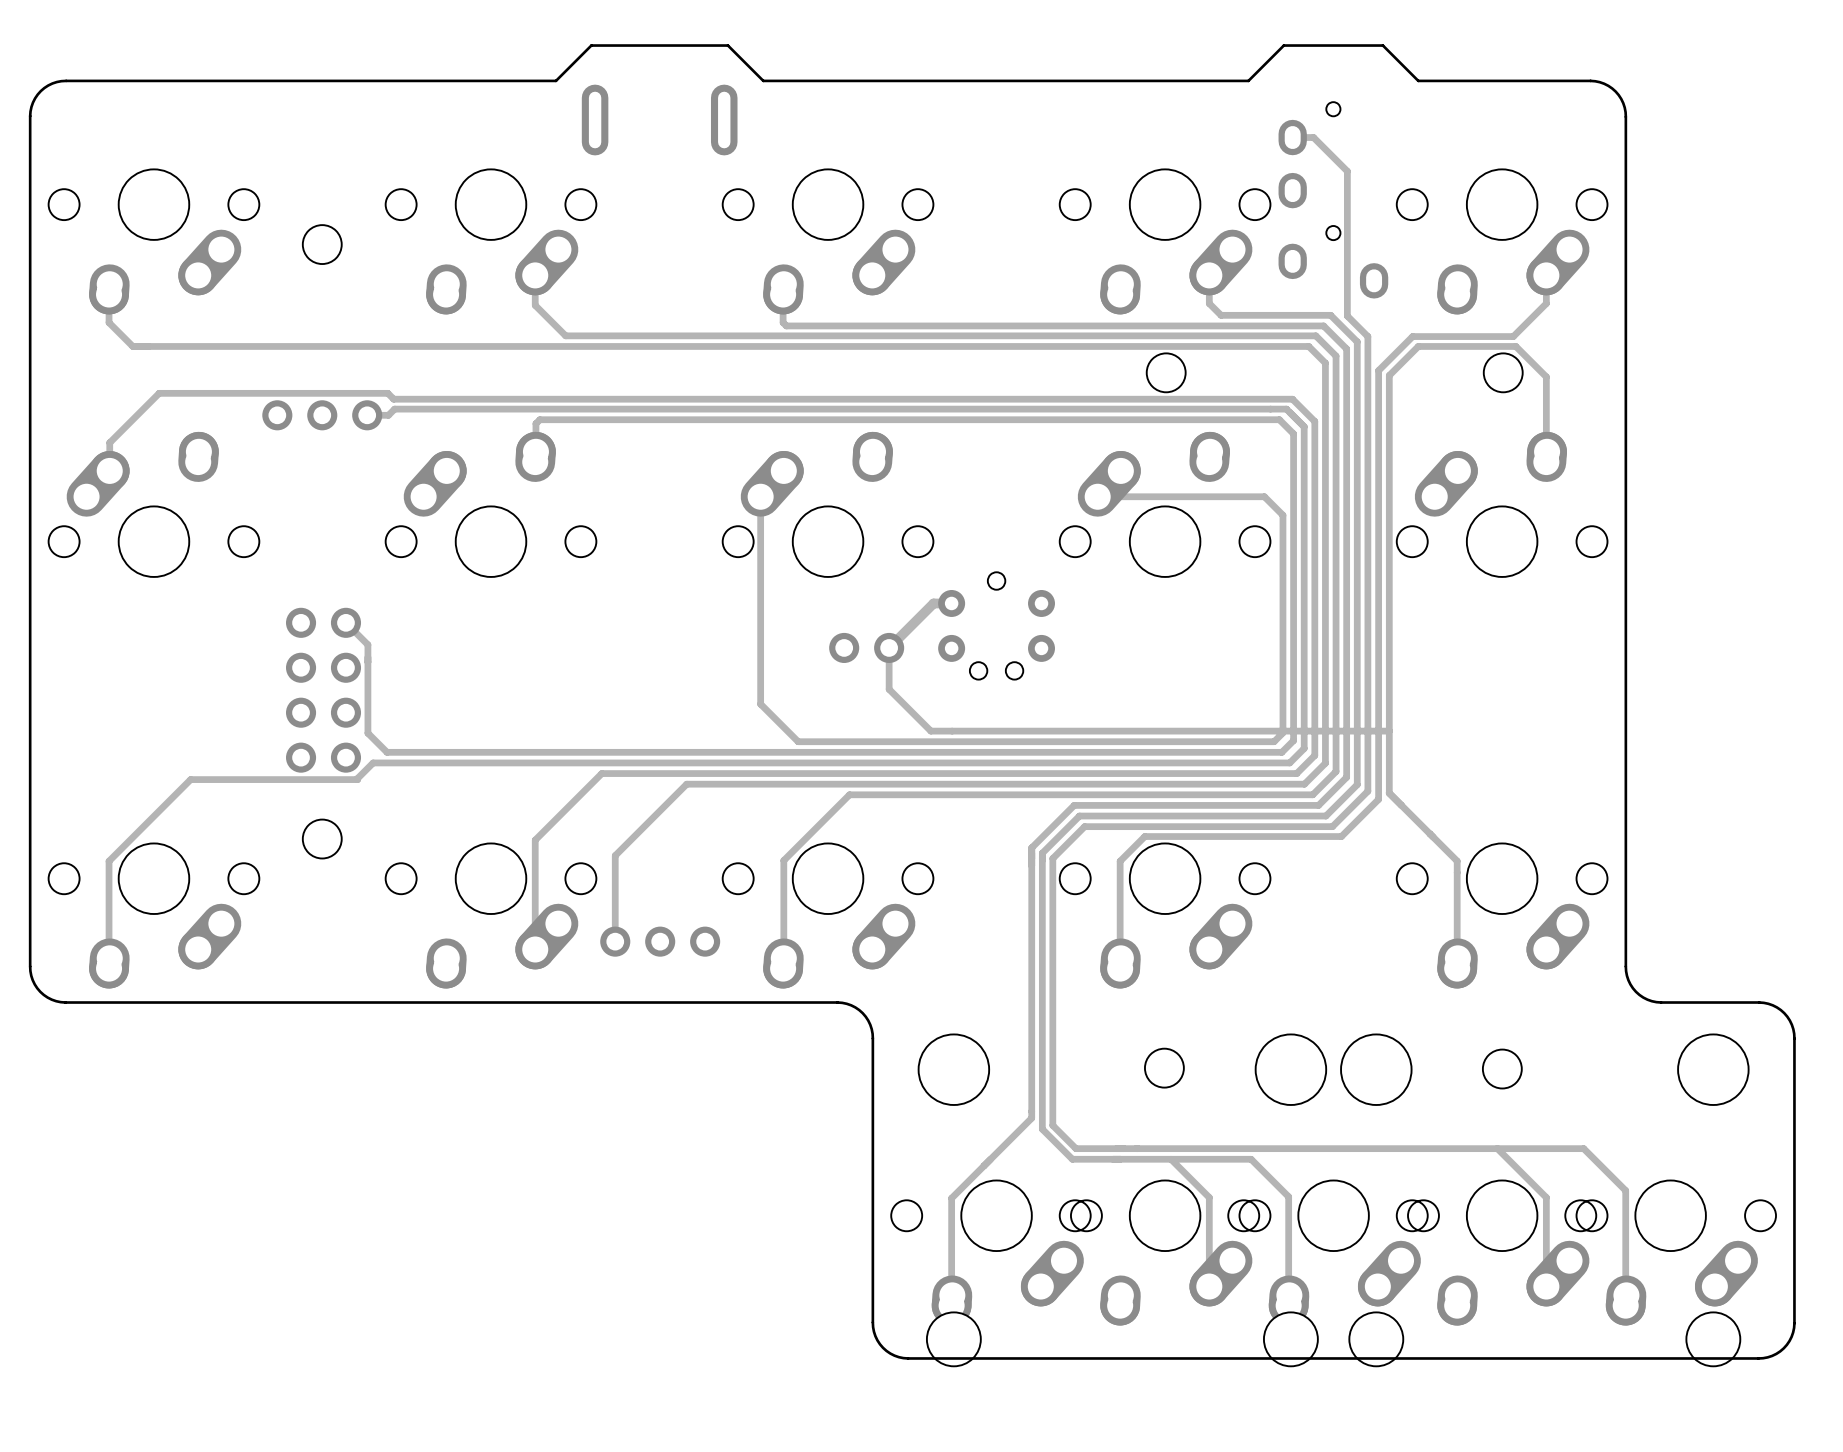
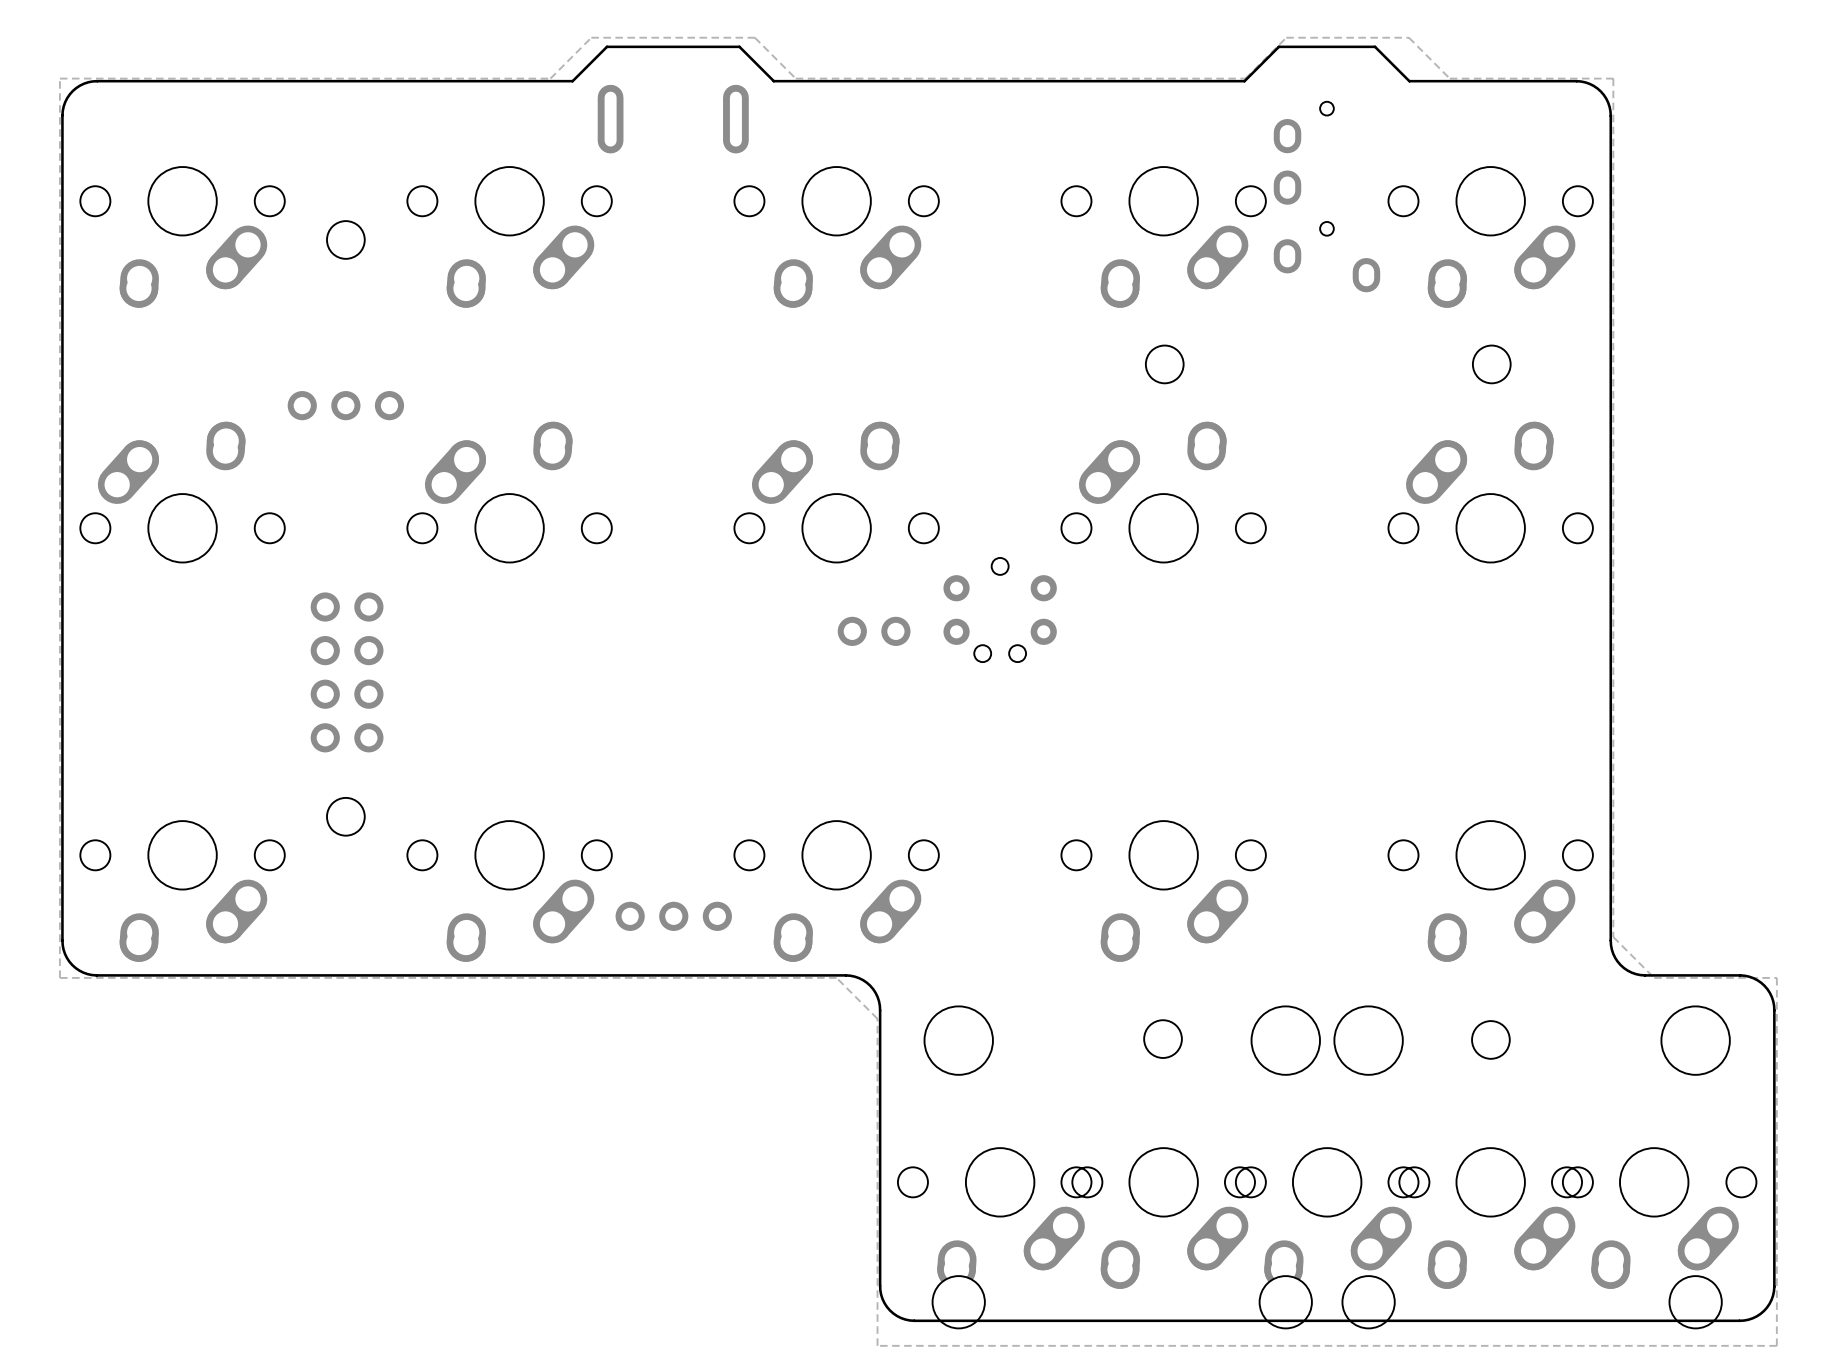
zone outline: none -> (591, 37) (754, 37) (795, 78) (1245, 78) (1286, 37) (1408, 37) (1449, 78) (1613, 78) (1613, 937) (1654, 977) (1776, 977) (1776, 1345) (877, 1345) (877, 1018) (836, 977) (59, 977) (59, 78) (550, 78) (591, 37)
track: (1292, 137) (1313, 137) (1347, 171) (1347, 316) (1367, 336) (1367, 791) (1332, 826) (1084, 826) (1052, 858) (1052, 1125) (1075, 1148) (1583, 1148) (1625, 1190) (1625, 1305) -> none
track: (535, 275) (535, 305) (565, 335) (1315, 335) (1336, 356) (1336, 771) (1312, 794) (849, 794) (783, 860) (783, 958) -> none
track: (1209, 275) (1209, 303) (1221, 315) (1330, 315) (1357, 341) (1357, 784) (1325, 816) (1079, 816) (1042, 853) (1042, 1129) (1072, 1159) (1251, 1159) (1288, 1196) (1288, 1305) -> none
track: (1546, 275) (1546, 303) (1513, 336) (1412, 336) (1378, 370) (1378, 799) (1341, 836) (1144, 836) (1120, 861) (1120, 968) -> none
track: (109, 294) (109, 322) (132, 346) (1308, 346) (1325, 363) (1325, 763) (1304, 784) (686, 784) (615, 855) (615, 941) -> none
track: (783, 294) (783, 322) (786, 325) (1323, 325) (1346, 348) (1346, 777) (1318, 805) (1074, 805) (1031, 847) (1031, 1118) (951, 1198) (951, 1305) -> none
track: (367, 415) (388, 415) (394, 409) (1286, 409) (1304, 426) (1304, 748) (1289, 762) (373, 762) (357, 779) (190, 779) (109, 861) (109, 968) -> none
track: (535, 451) (535, 423) (539, 419) (1279, 419) (1293, 433) (1293, 740) (1281, 752) (387, 752) (367, 733) (367, 644) (345, 622) -> none
track: (1546, 462) (1546, 376) (1515, 346) (1418, 346) (1389, 375) (1389, 793) -> none
track: (109, 470) (109, 442) (159, 393) (387, 393) (393, 399) (1292, 399) (1314, 421) (1314, 755) (1296, 773) (601, 773) (535, 840) (535, 949) -> none
track: (760, 496) (760, 704) (798, 741) (1274, 741) (1282, 732) (1282, 515) (1264, 496) (1097, 496) -> none
track: (951, 603) (933, 603) (889, 647) (889, 689) (930, 731) (1389, 731) -> none
track: (1389, 793) (1457, 861) (1457, 968) -> none
track: (1497, 1148) (1546, 1197) (1546, 1286) -> none
track: (1171, 1159) (1209, 1197) (1209, 1286) -> none

